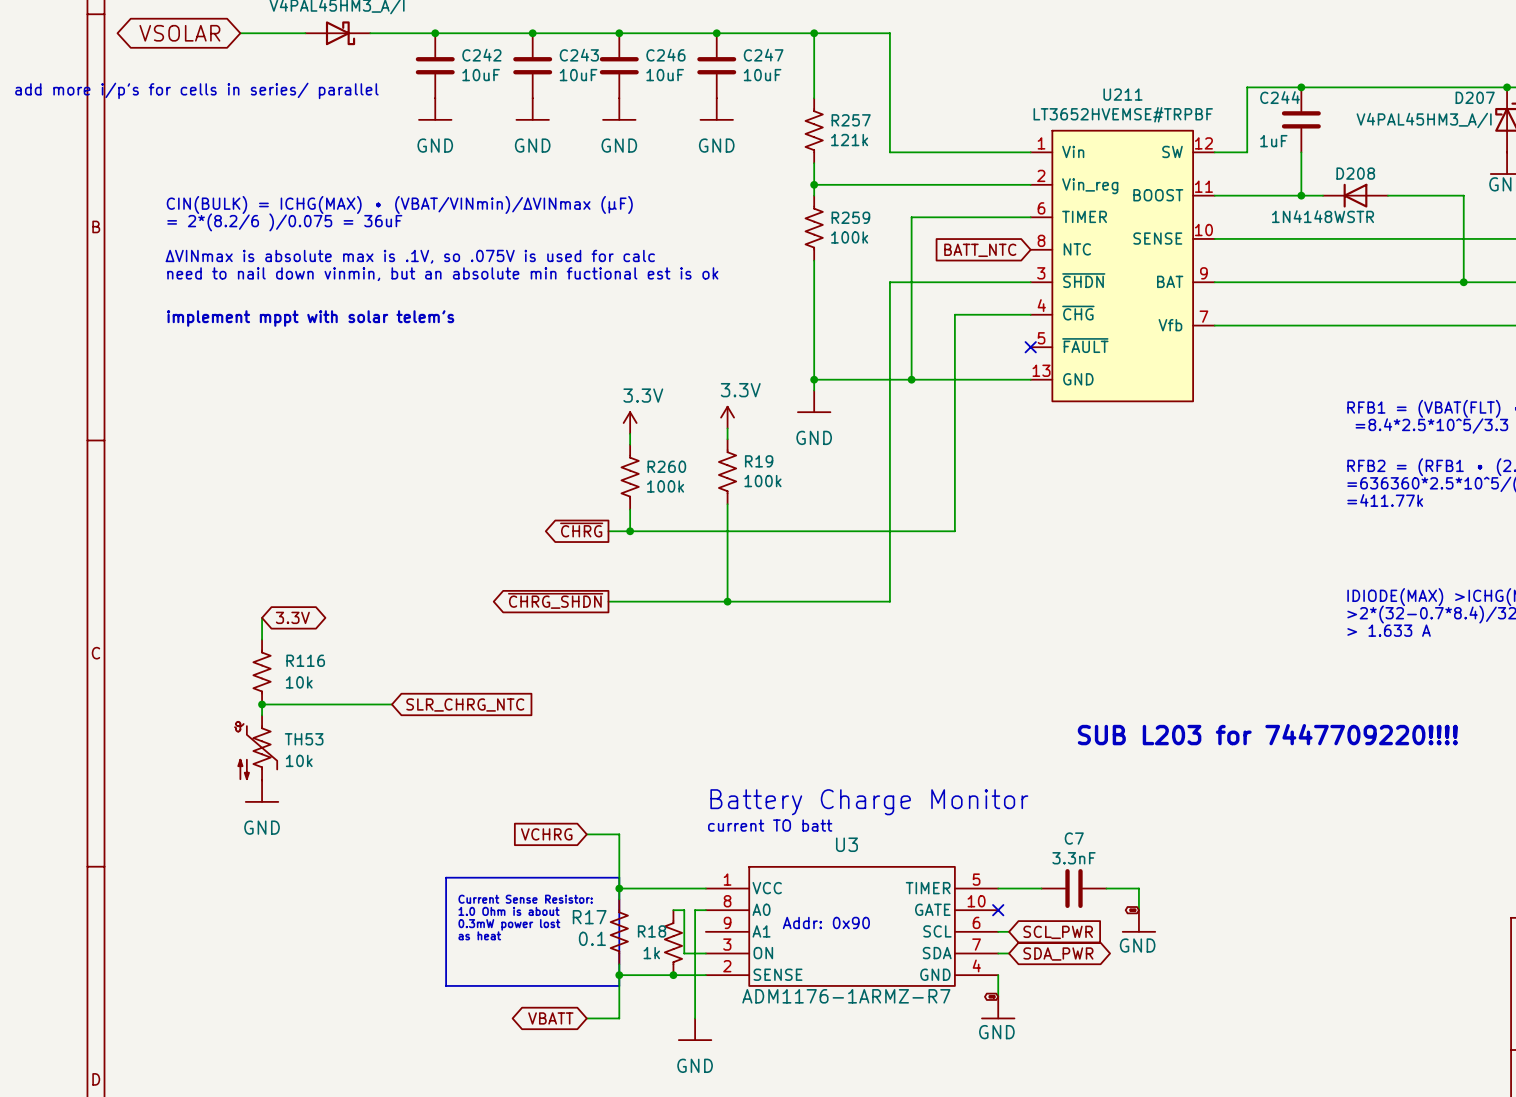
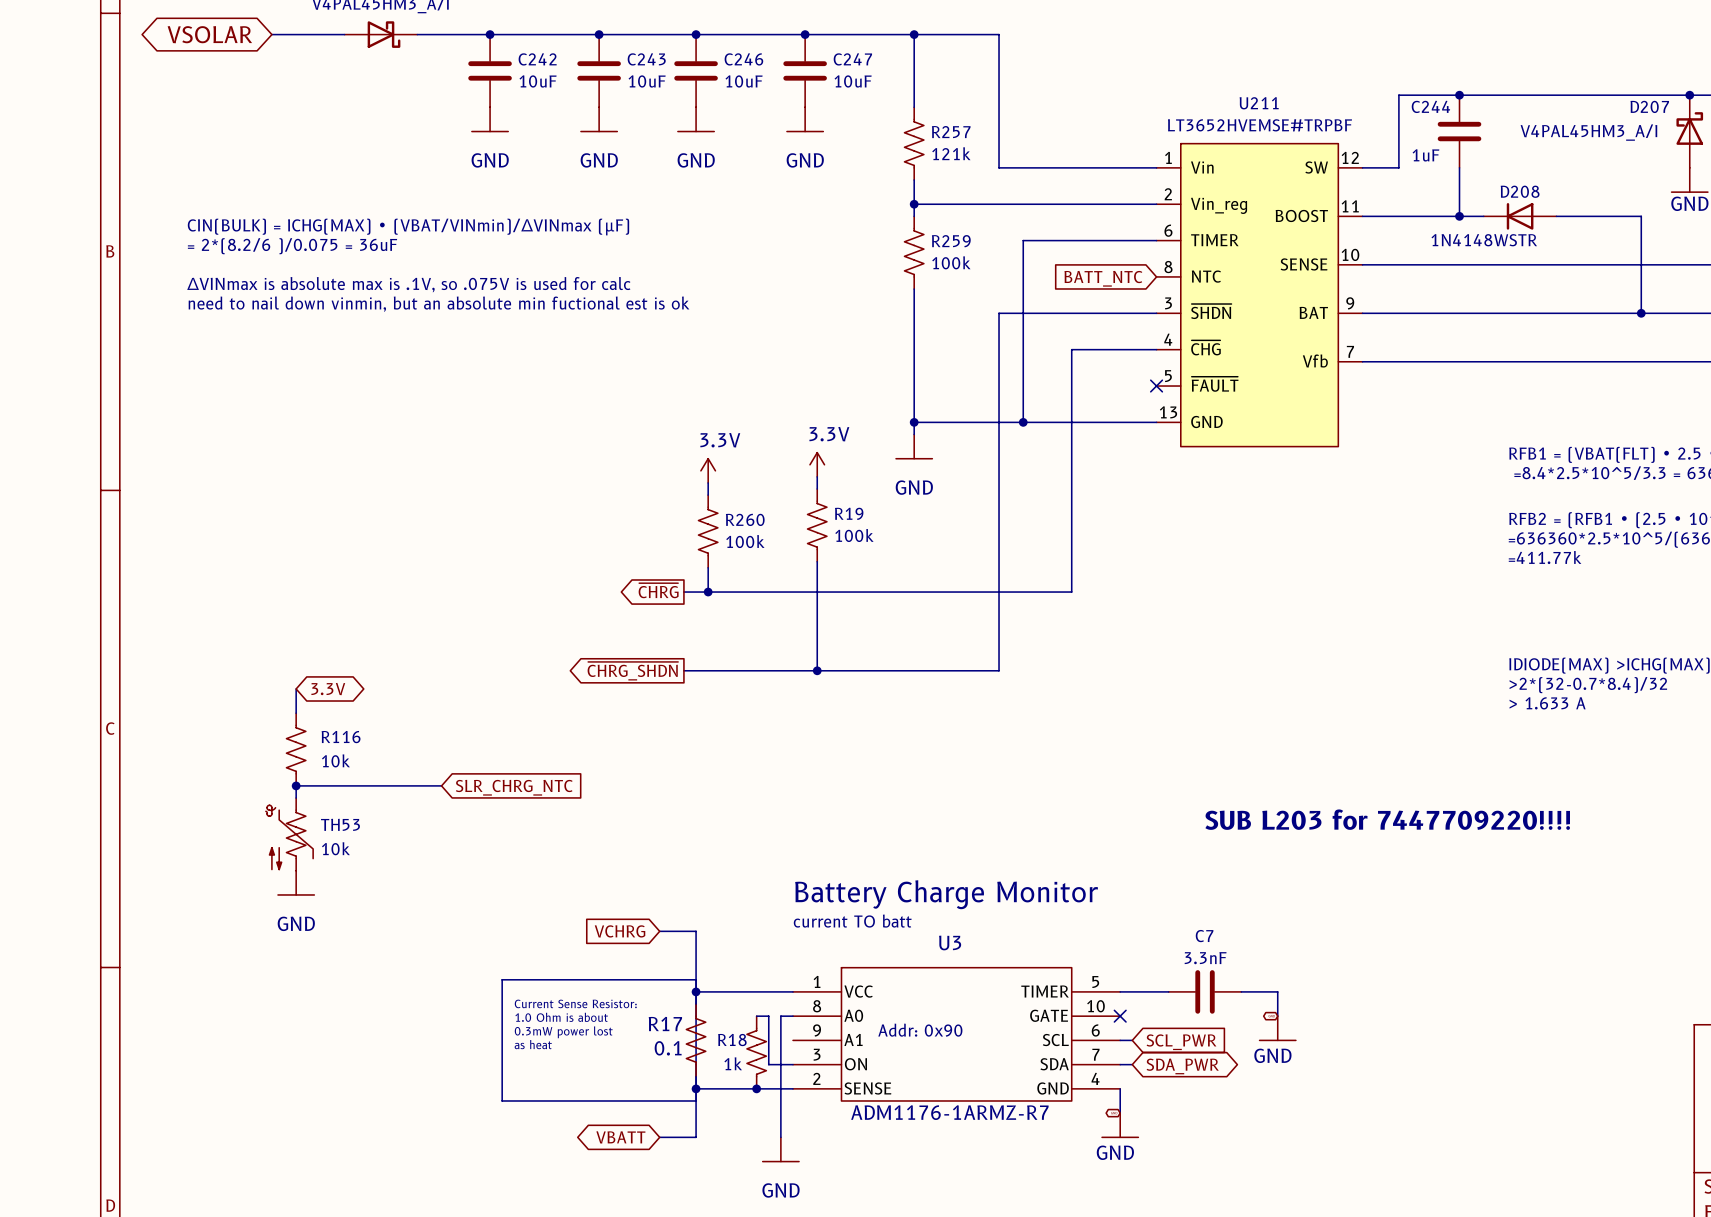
text: add more i/p's for cells in series/ parallel (196, 90) -> none
text: implement mppt with solar telem's (310, 318) -> none

